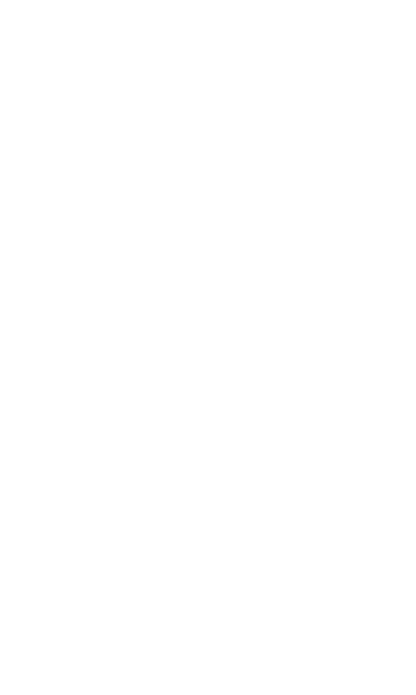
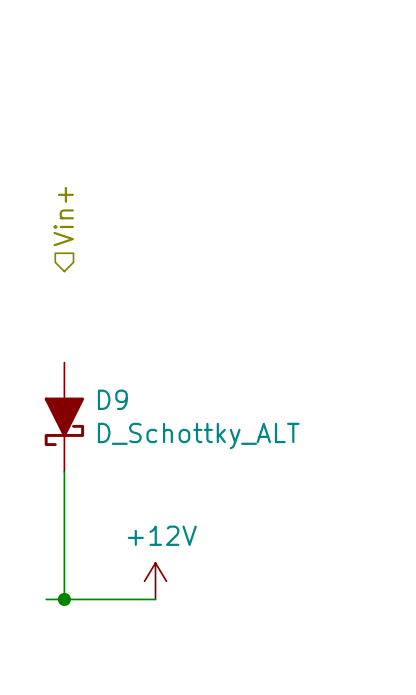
hierarchical label: none -> Vin+ (63, 216)
D9: none -> D_Schottky_ALT (64, 417)
wire: none -> (64, 471) (64, 599)
power symbol: none -> +12V (155, 581)
wire: none -> (46, 599) (155, 599)
junction: none -> (64, 599)

